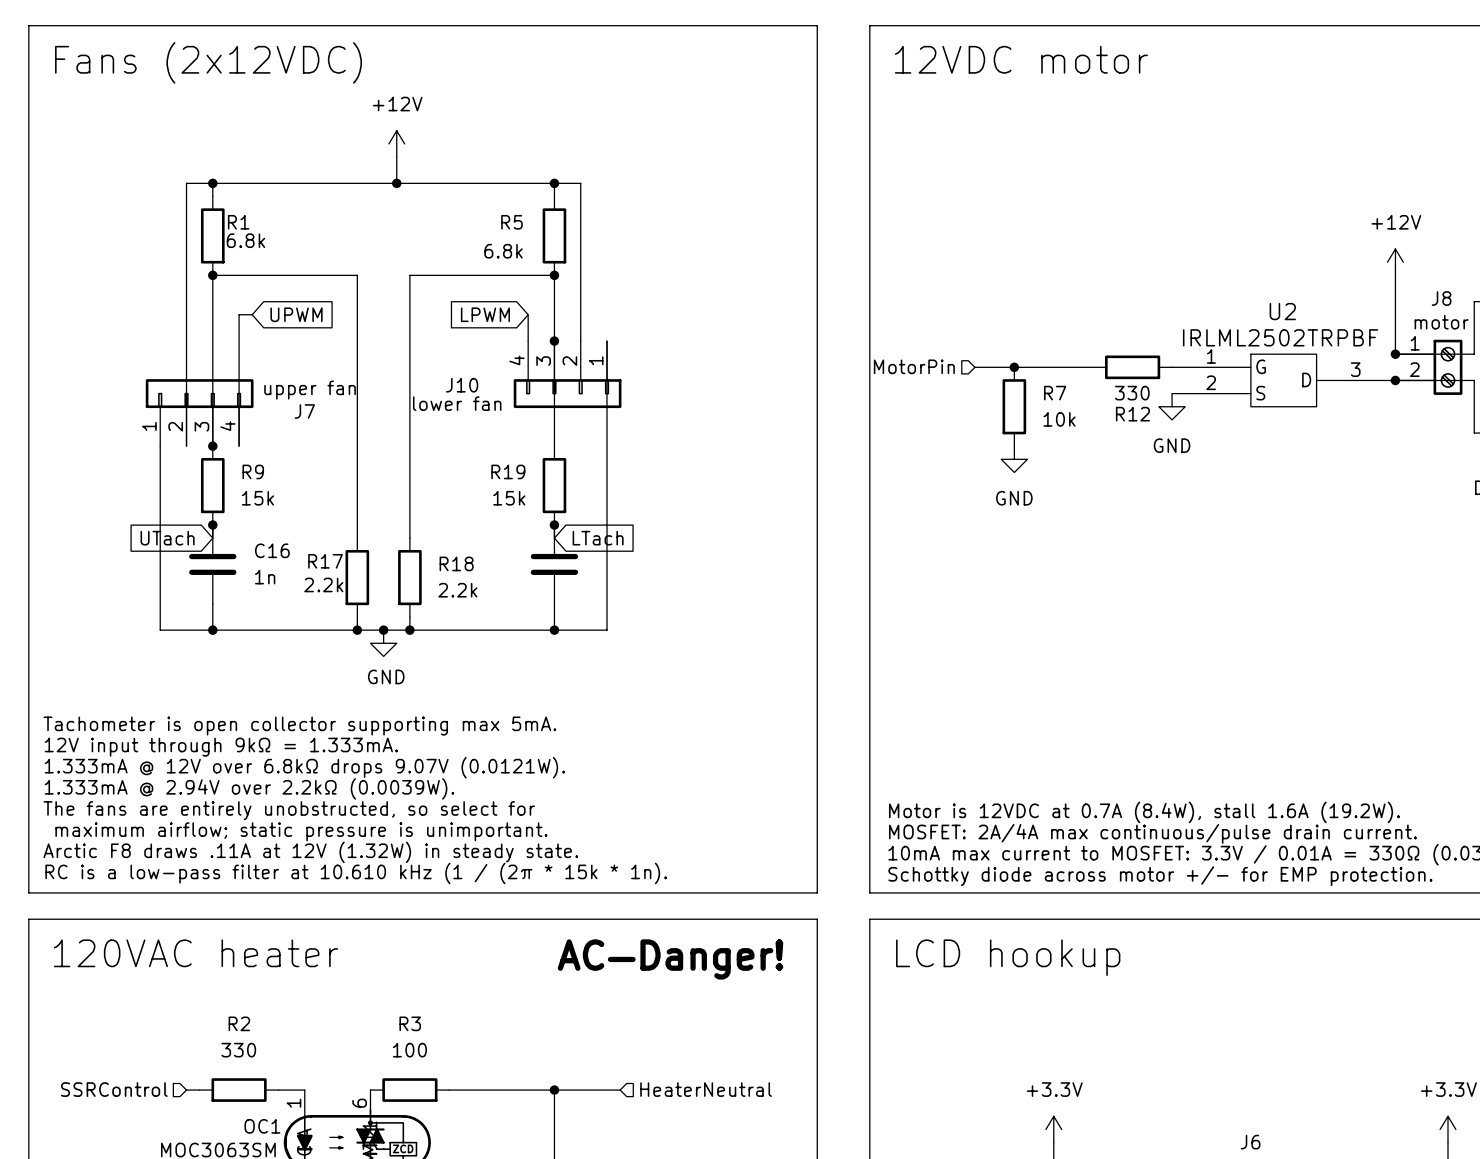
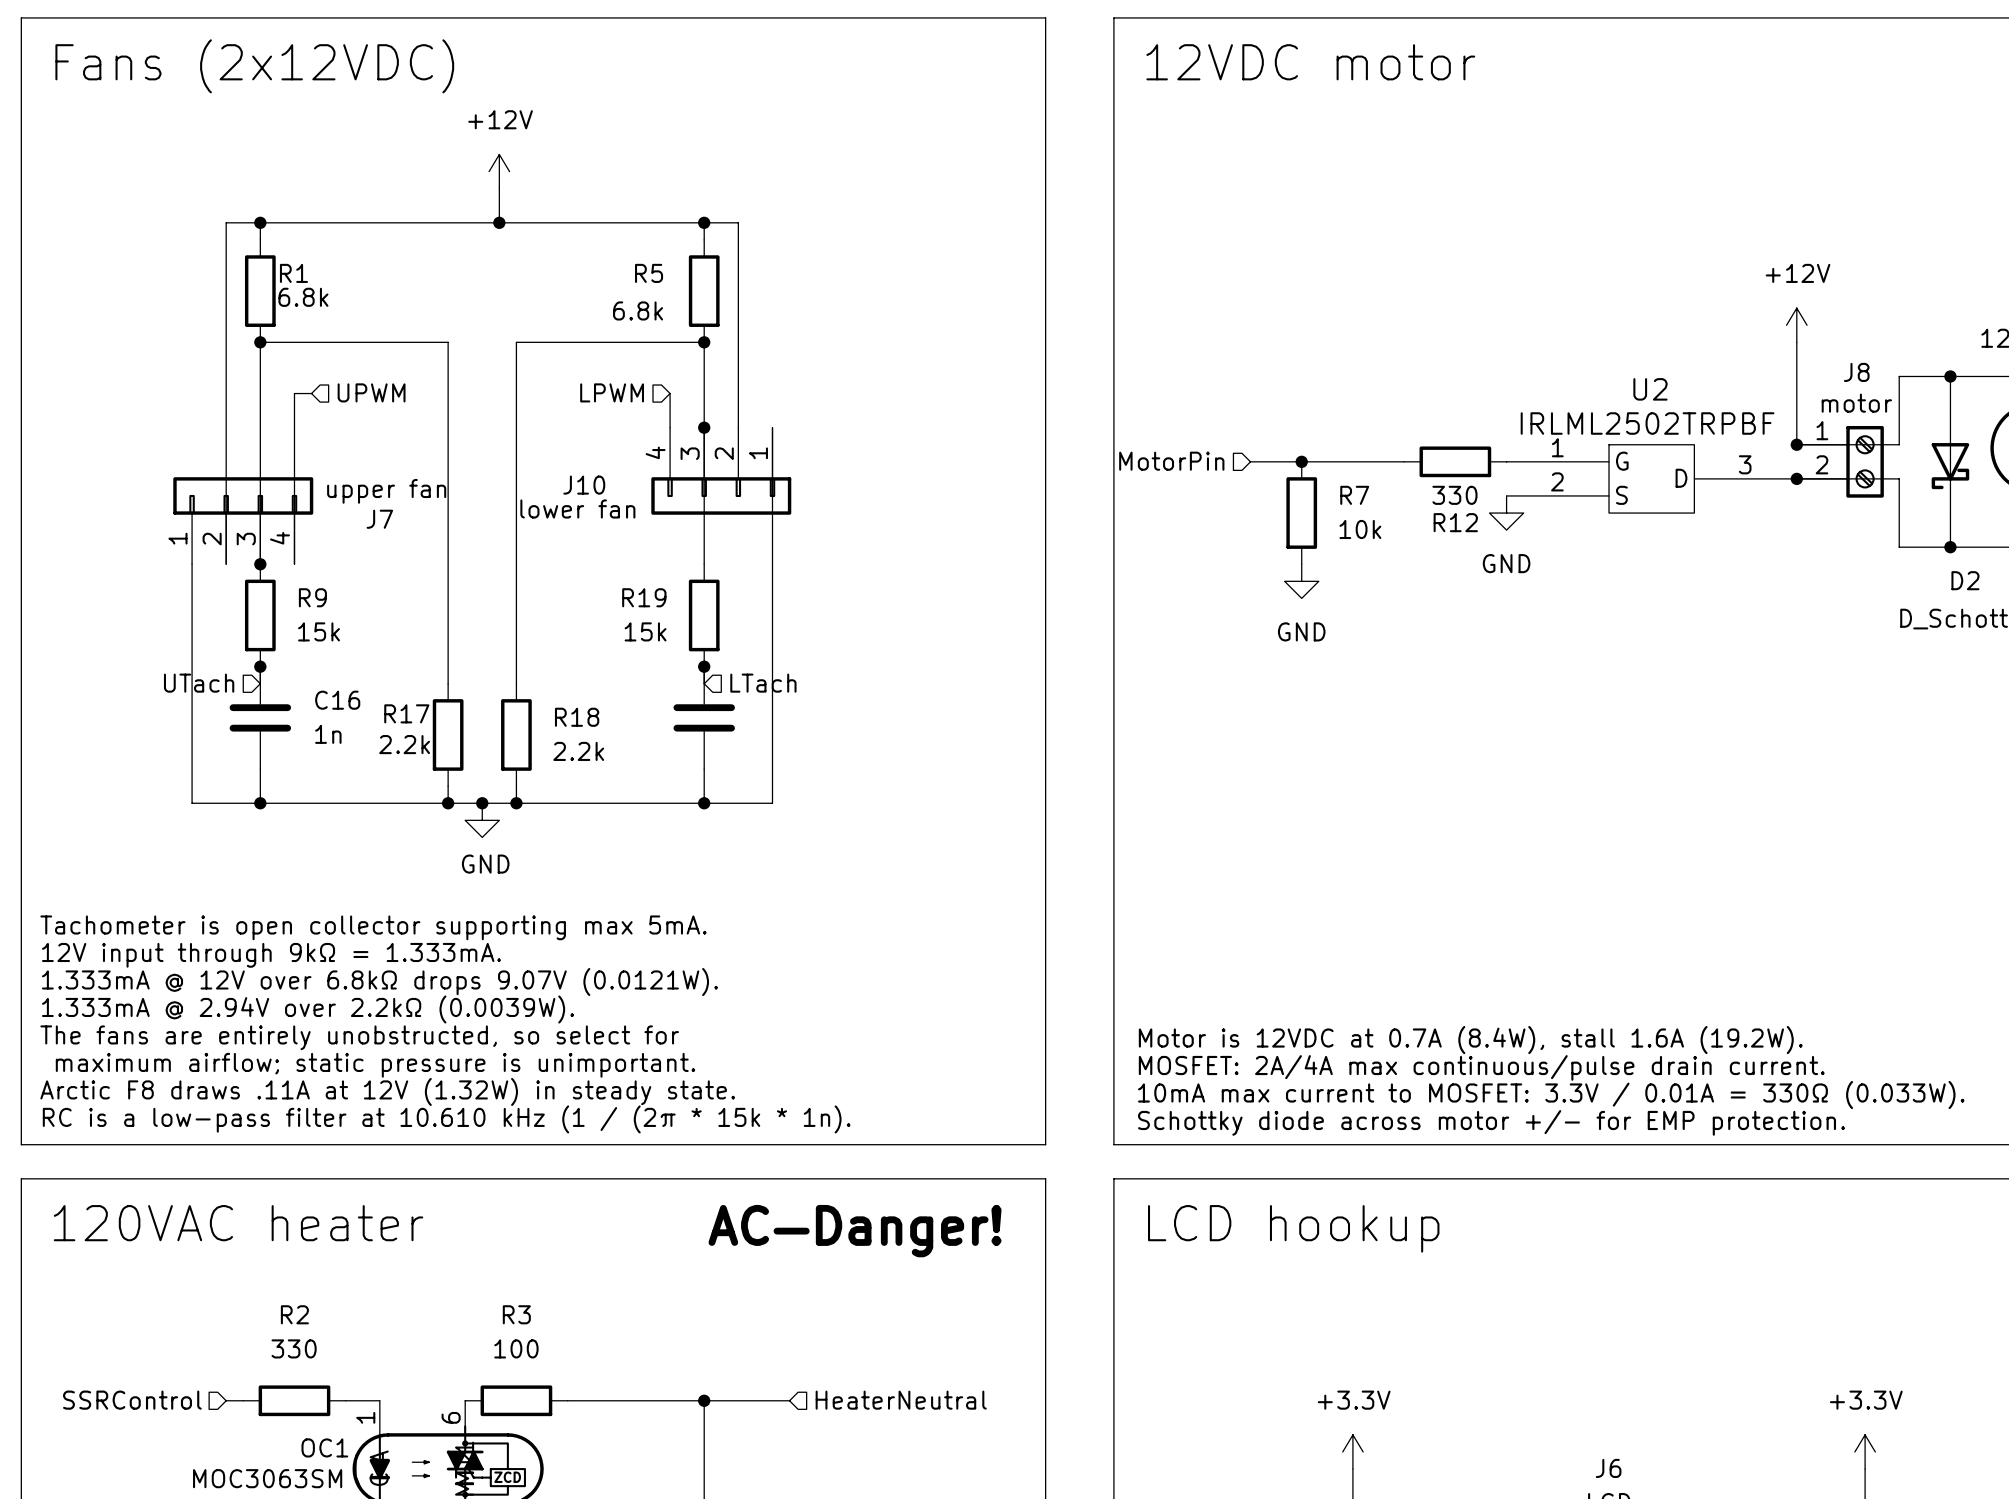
global label: UPWM (296, 314) -> none
hierarchical label: none -> UPWM (371, 392)
hierarchical label: none -> LPWM (612, 392)
global label: LPWM (485, 314) -> none
hierarchical label: none -> UTach (199, 683)
hierarchical label: none -> LTach (763, 683)
global label: UTach (167, 538) -> none
global label: LTach (598, 538) -> none

